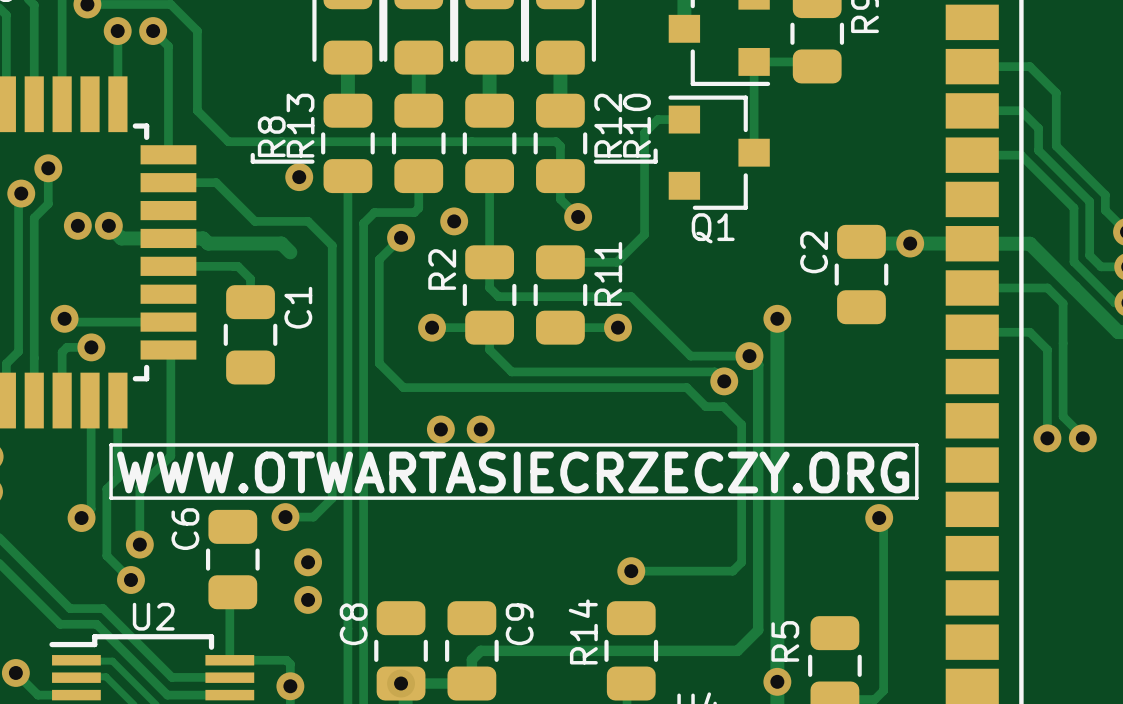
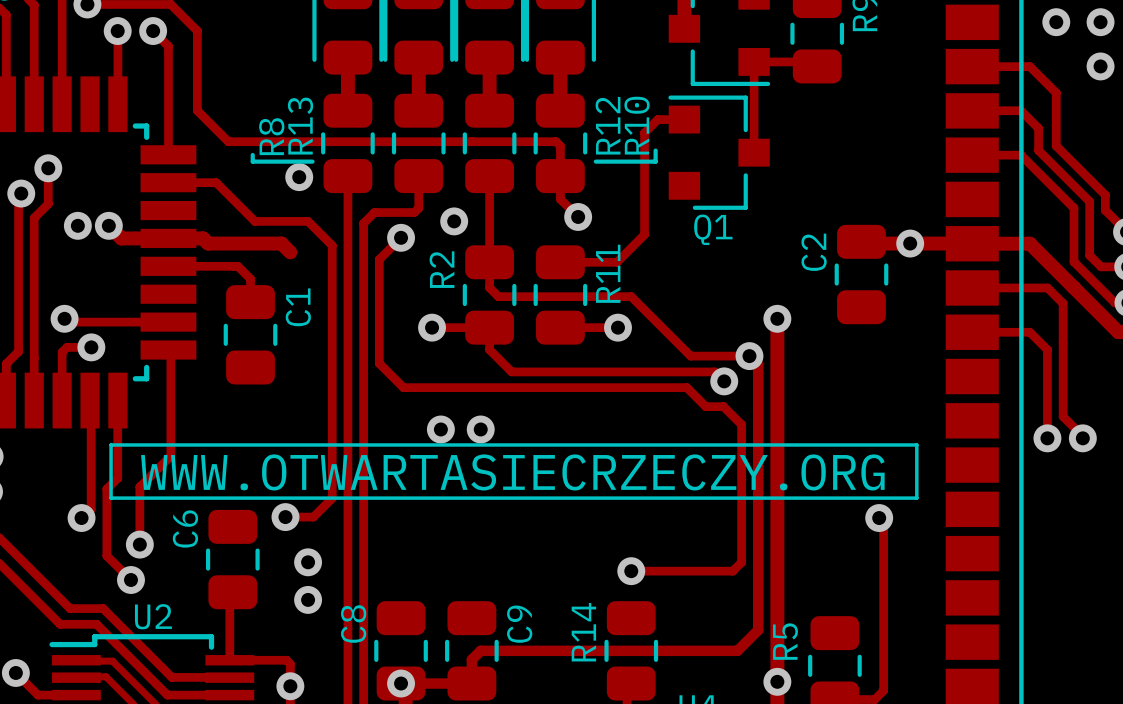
via: none -> (1056, 22)
via: none -> (1100, 22)
via: none -> (1100, 66)

